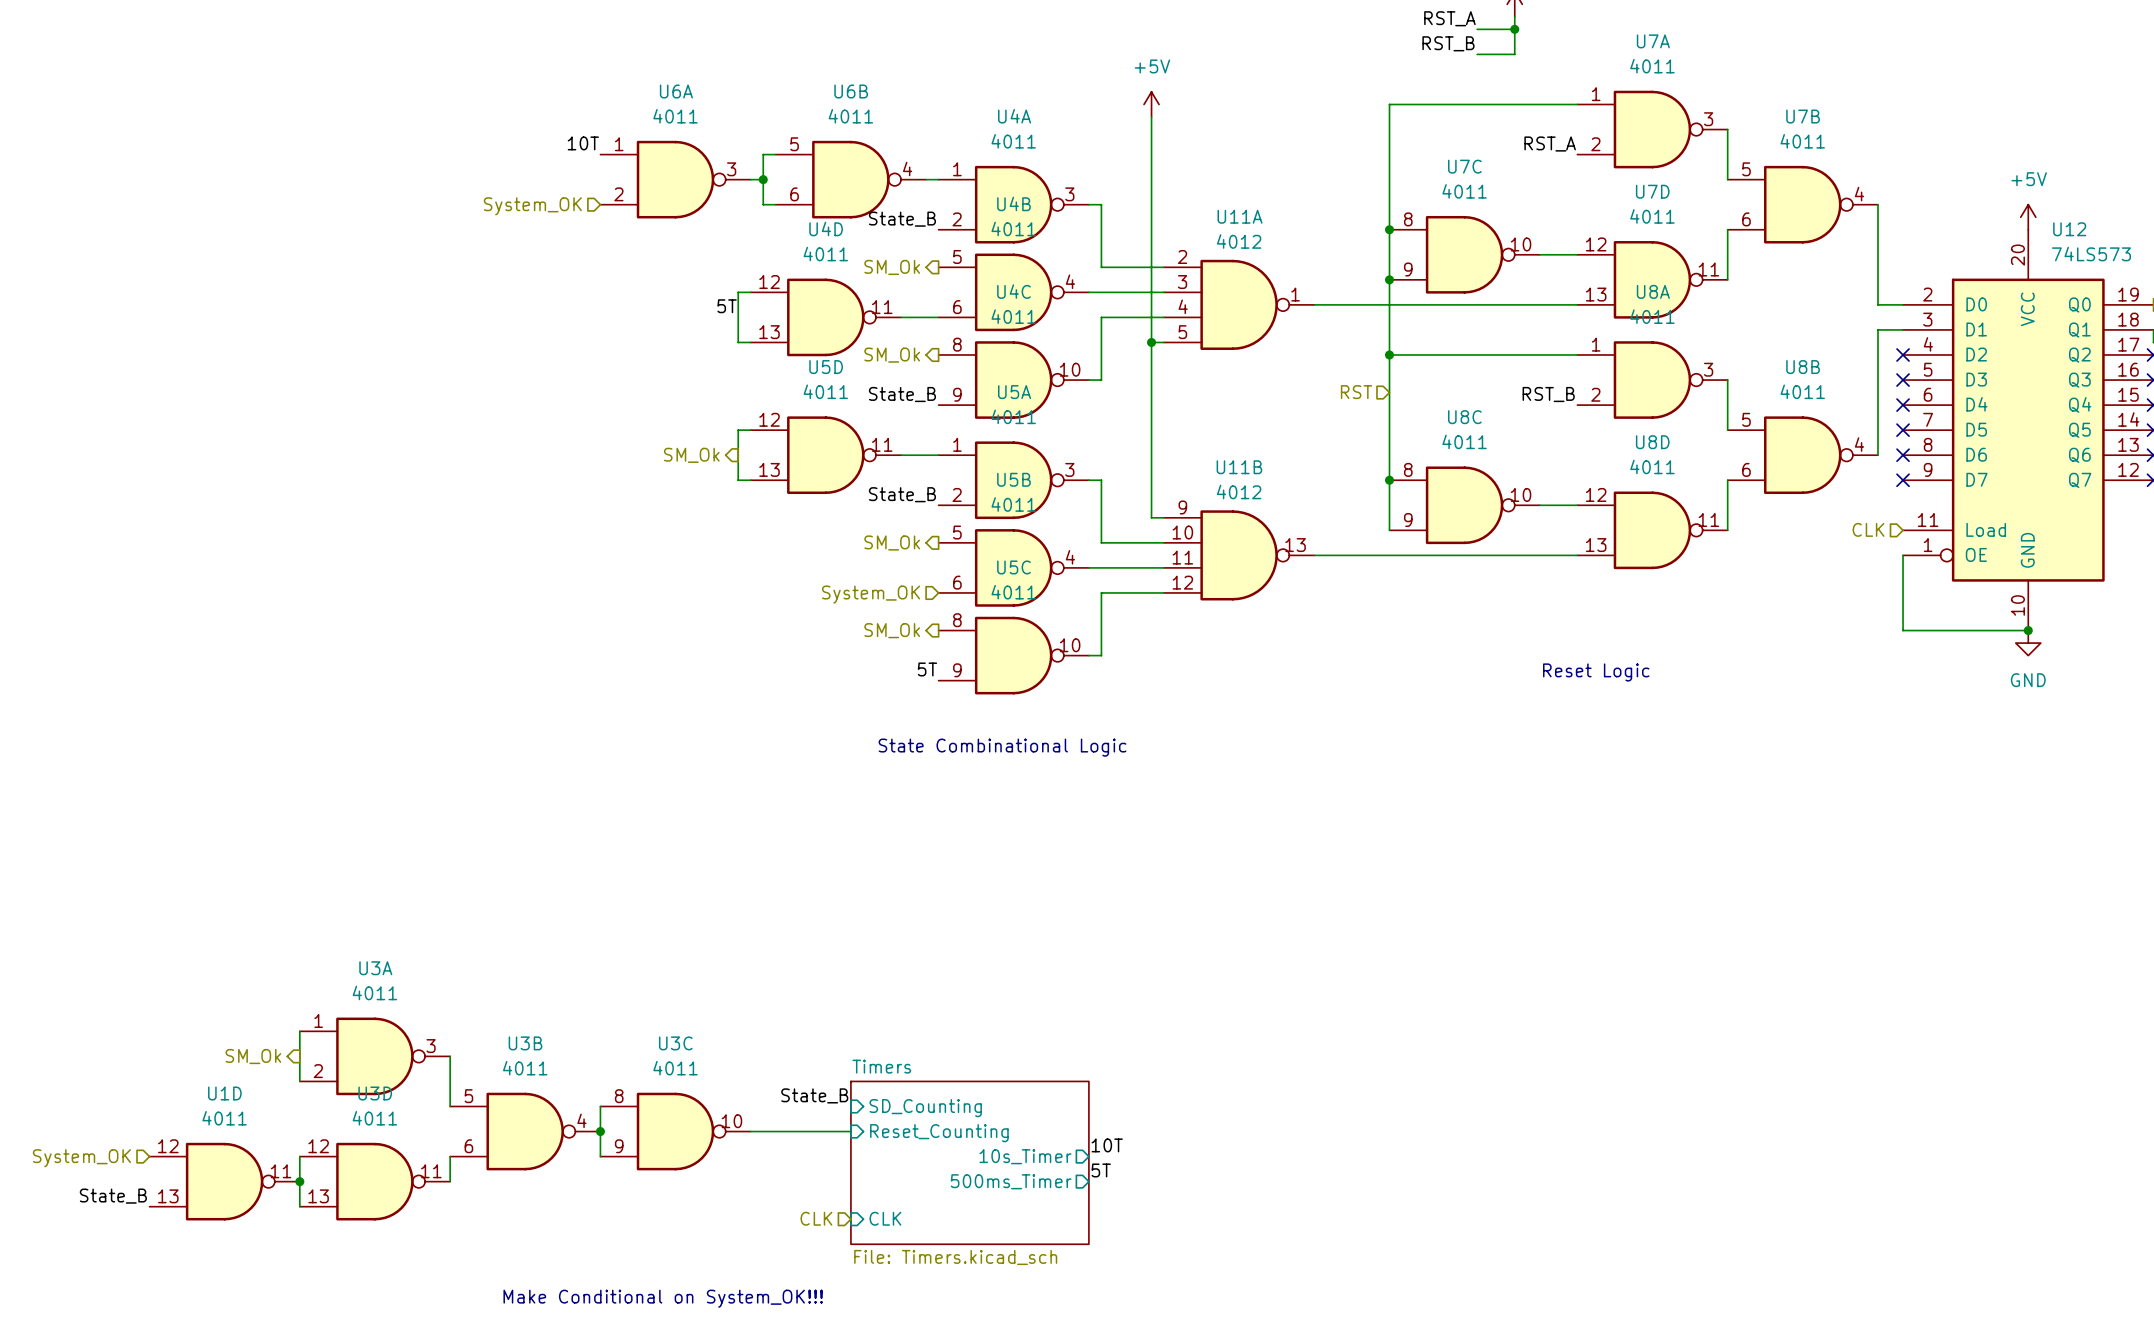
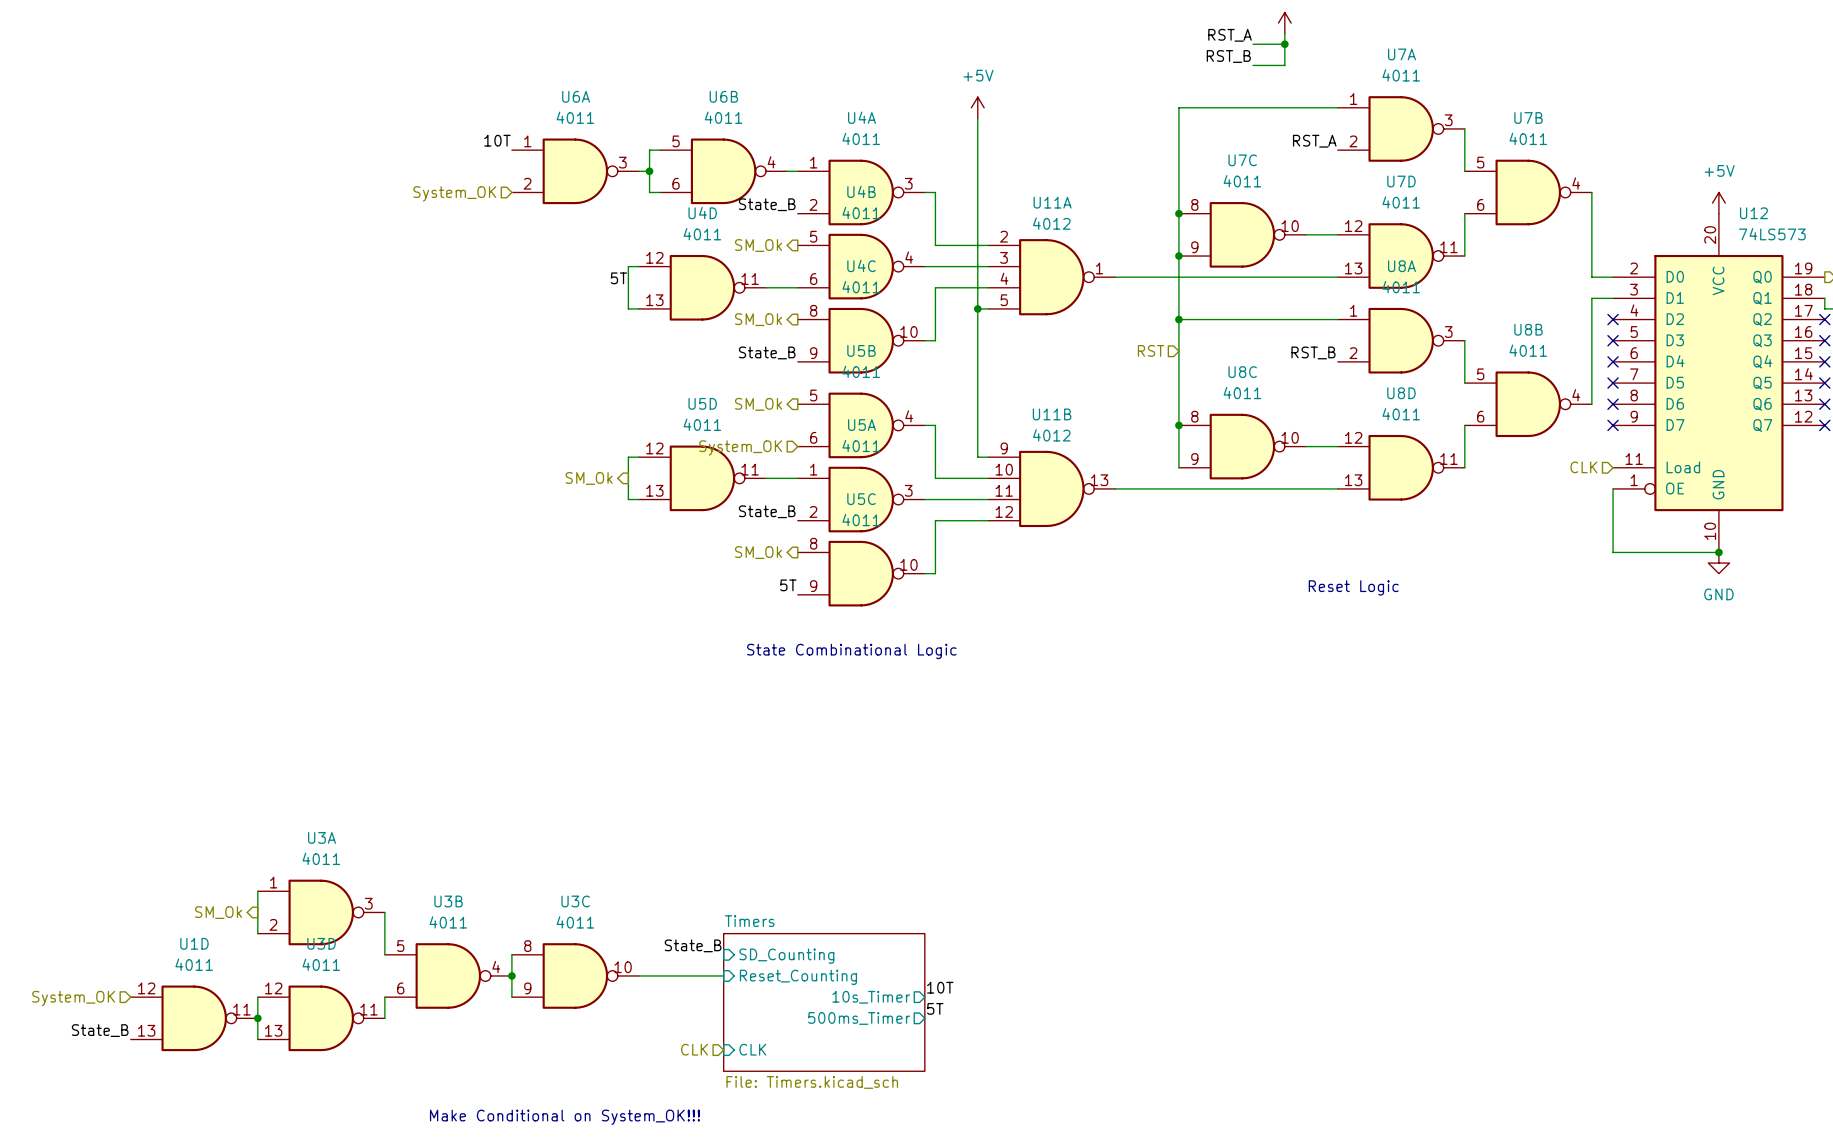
wire: (750, 430) (738, 430) (738, 480) (750, 480) -> (638, 457) (628, 457) (628, 499) (638, 499)
hierarchical label position: SM_Ok (691, 455) -> SM_Ok (589, 478)
U5D position: (825, 455) -> (702, 478)
wire: (901, 455) (938, 455) -> (766, 478) (797, 478)
U5A position: (1013, 480) -> (861, 499)
label position: State_B (902, 494) -> State_B (767, 511)
hierarchical label position: SM_Ok (892, 542) -> SM_Ok (758, 404)
U5B position: (1013, 567) -> (861, 425)
hierarchical label position: System_OK (871, 594) -> System_OK (740, 447)

